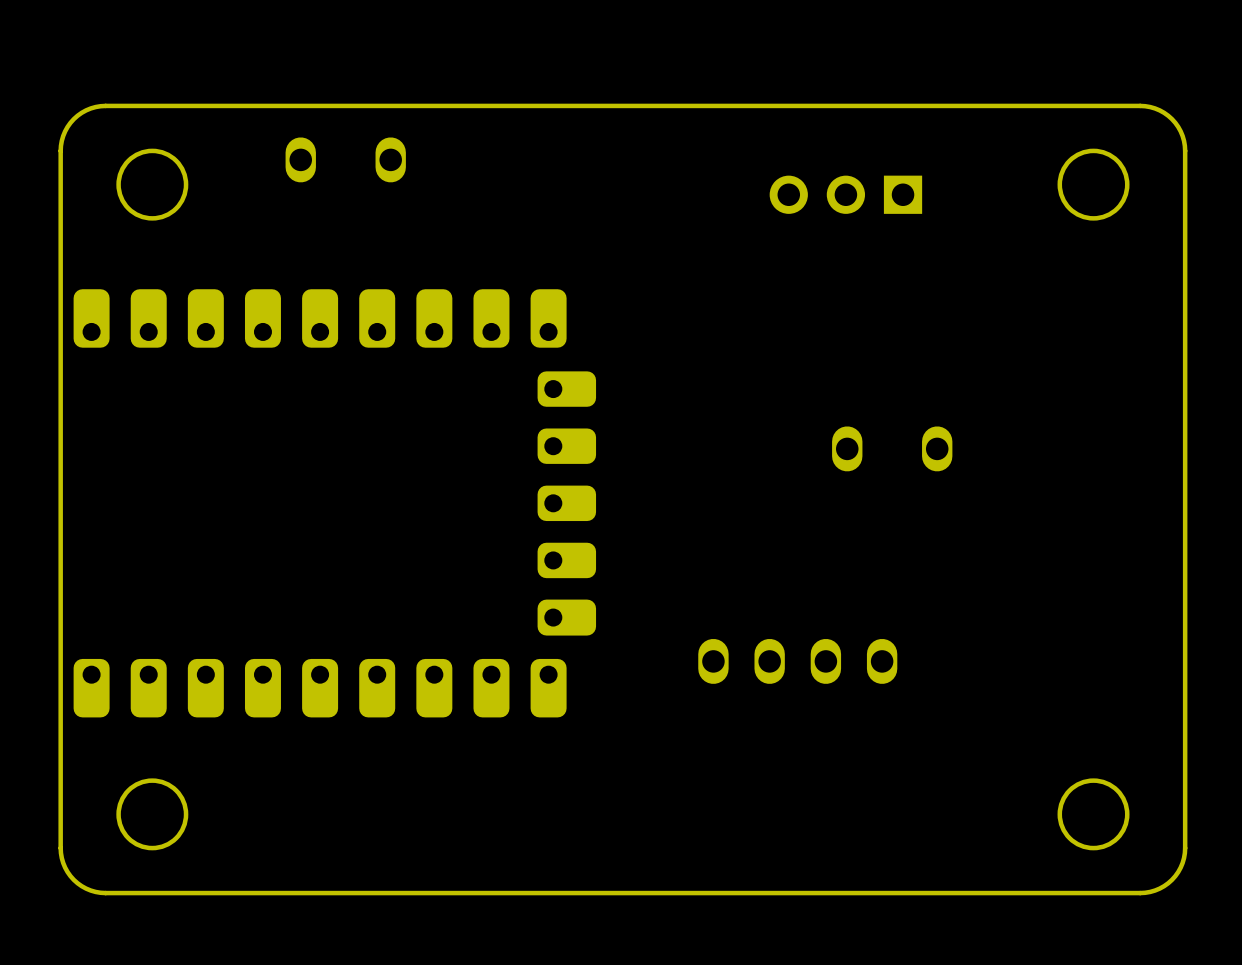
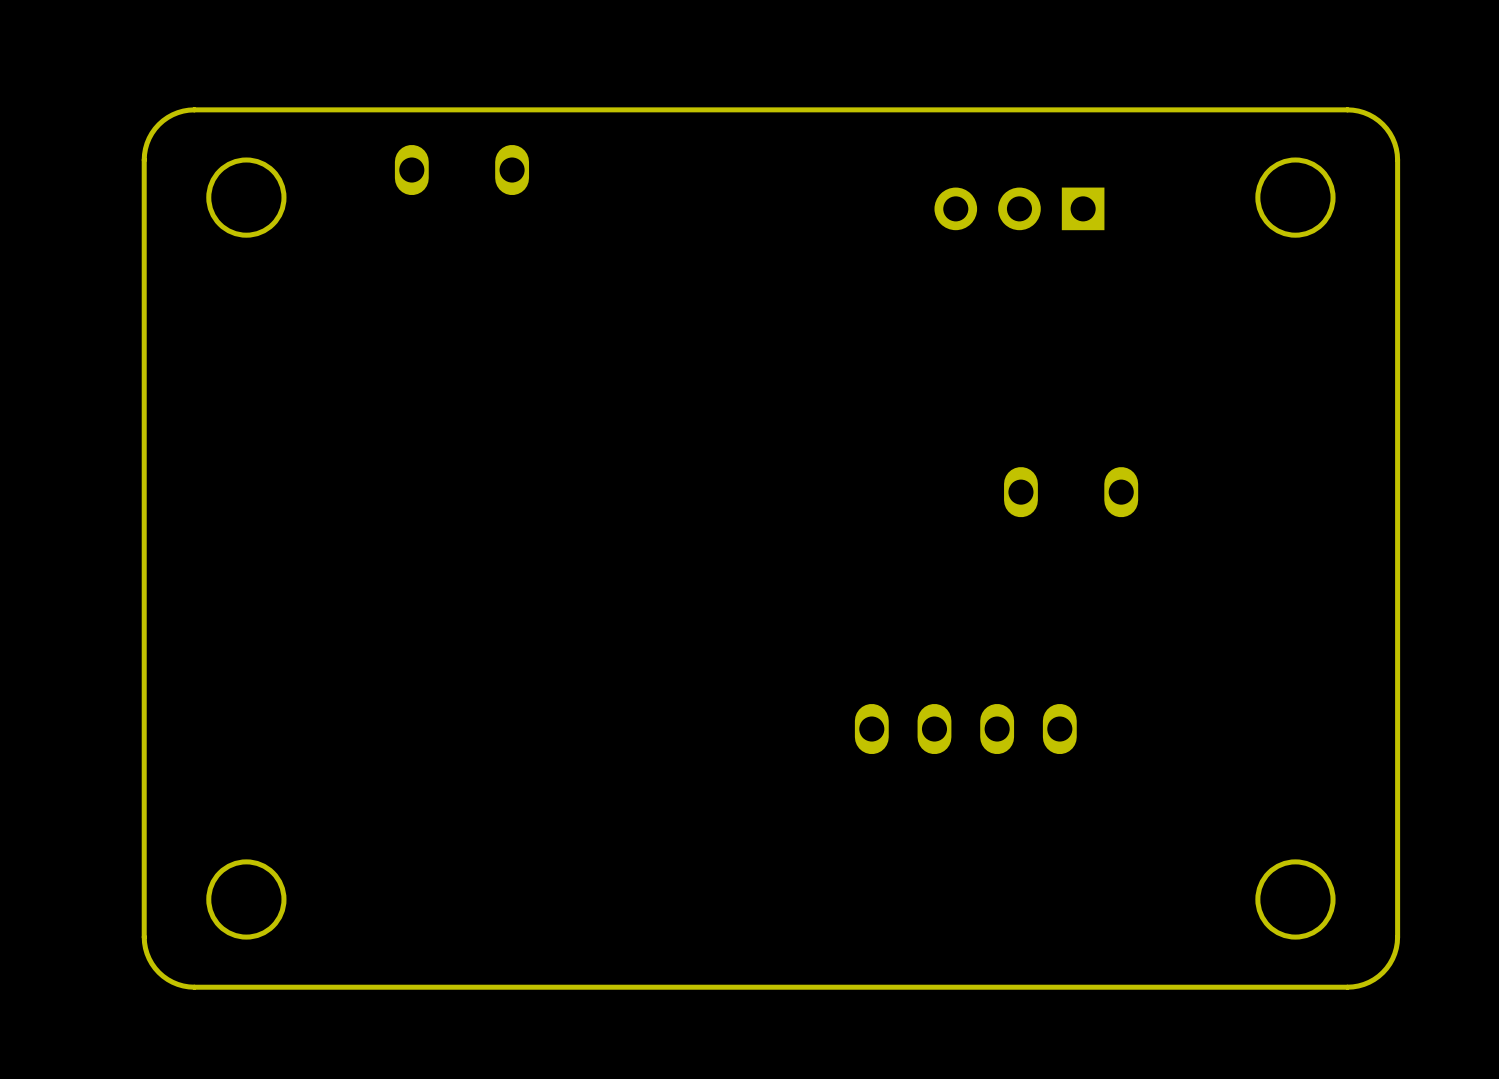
part: (334, 503) -> none

